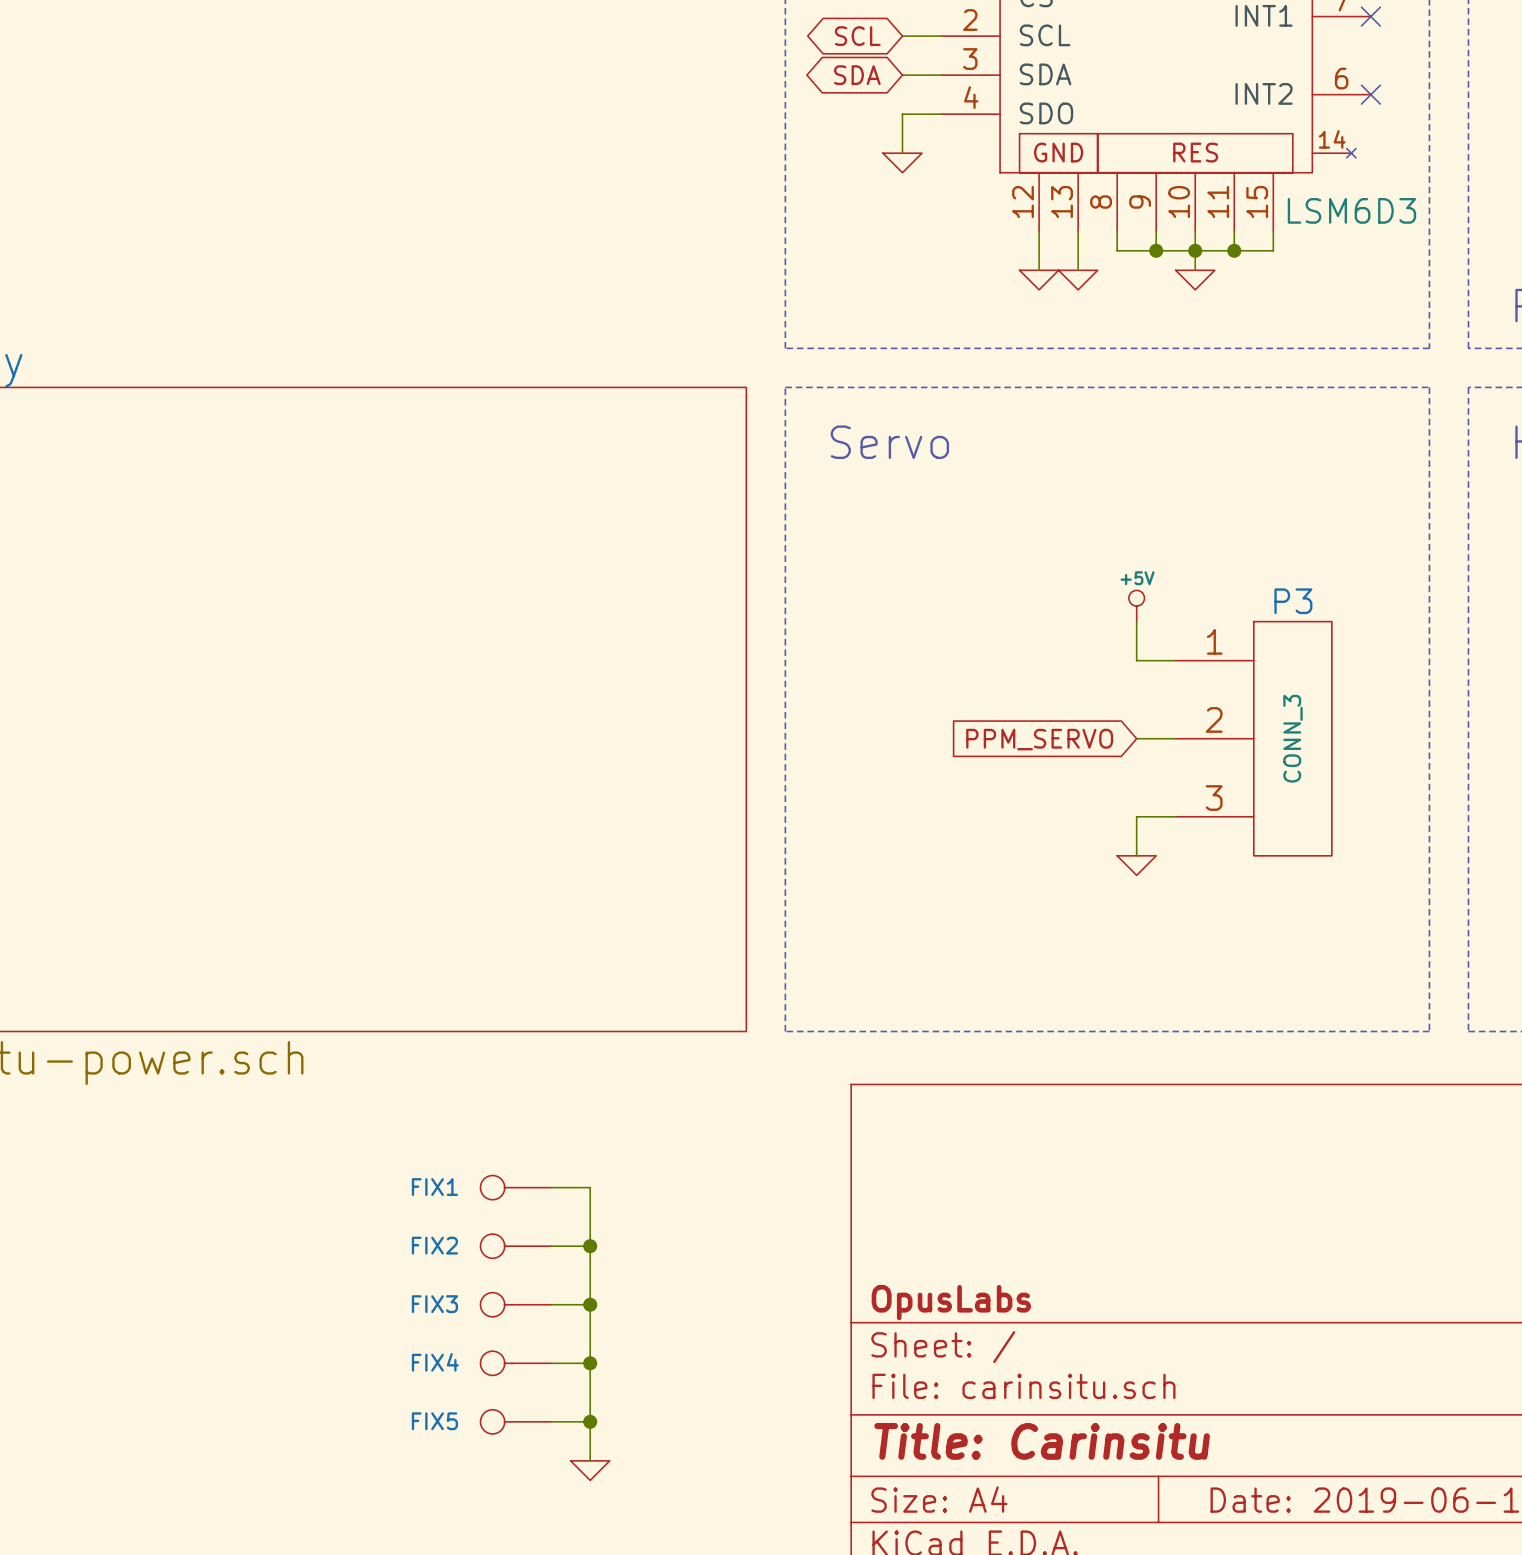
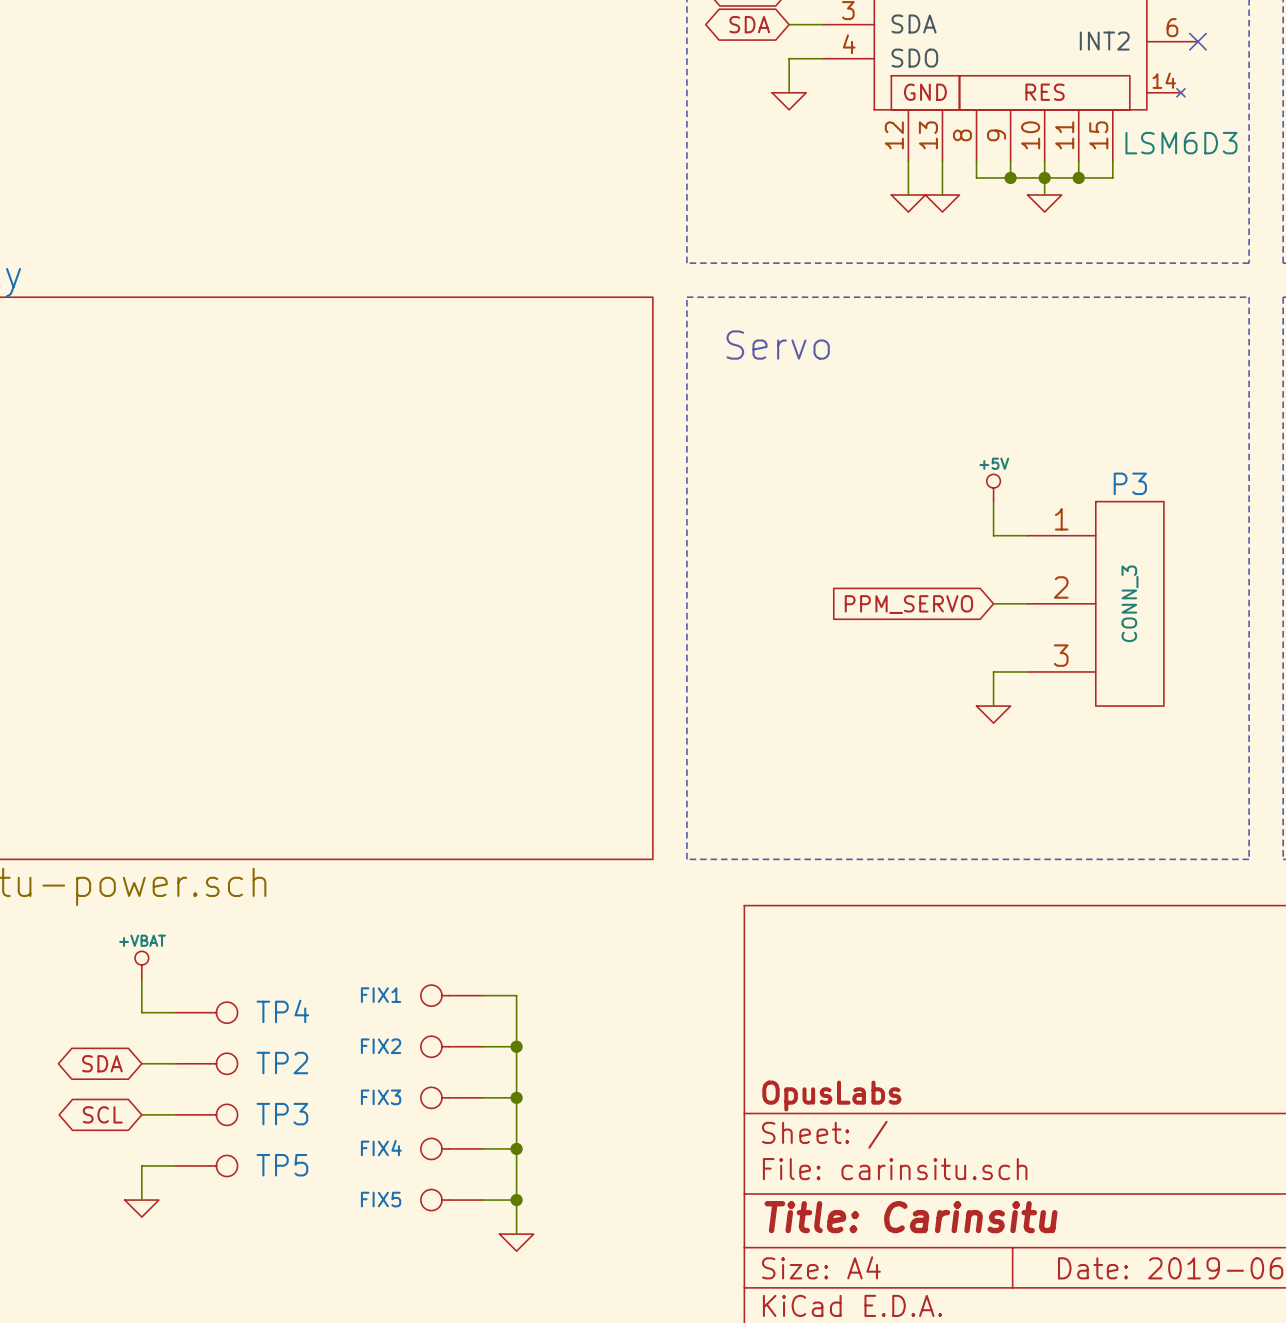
power symbol: none -> +VBAT (141, 964)
wire: none -> (141, 978) (141, 1012) (175, 1012)
TP4: none -> (206, 1012)
global label: none -> SDA (102, 1063)
wire: none -> (141, 1063) (175, 1063)
TP2: none -> (206, 1063)
global label: none -> SCL (102, 1114)
wire: none -> (141, 1114) (175, 1114)
TP3: none -> (206, 1114)
wire: none -> (175, 1165) (141, 1165) (141, 1200)
TP5: none -> (206, 1165)
power symbol: none -> (141, 1208)

